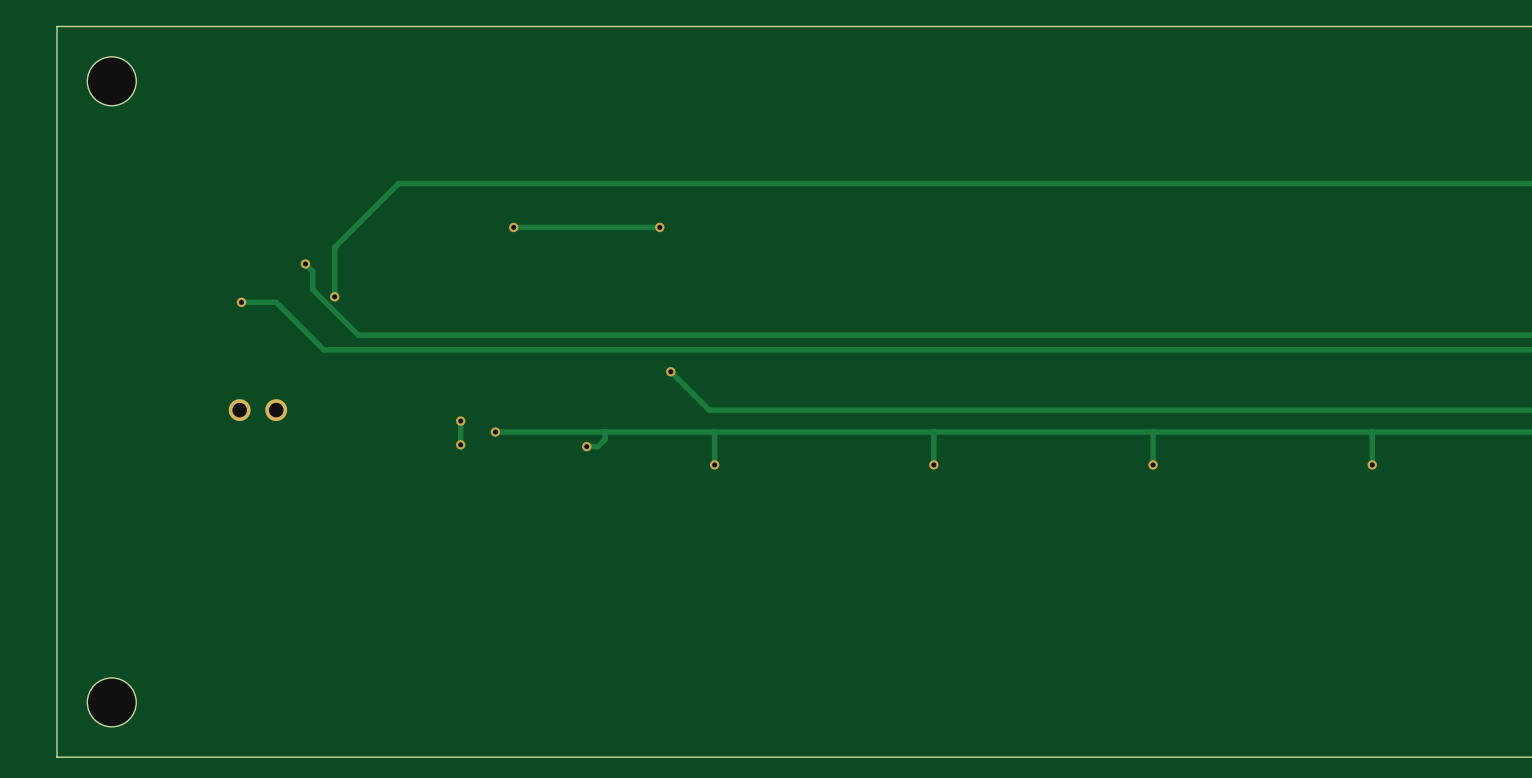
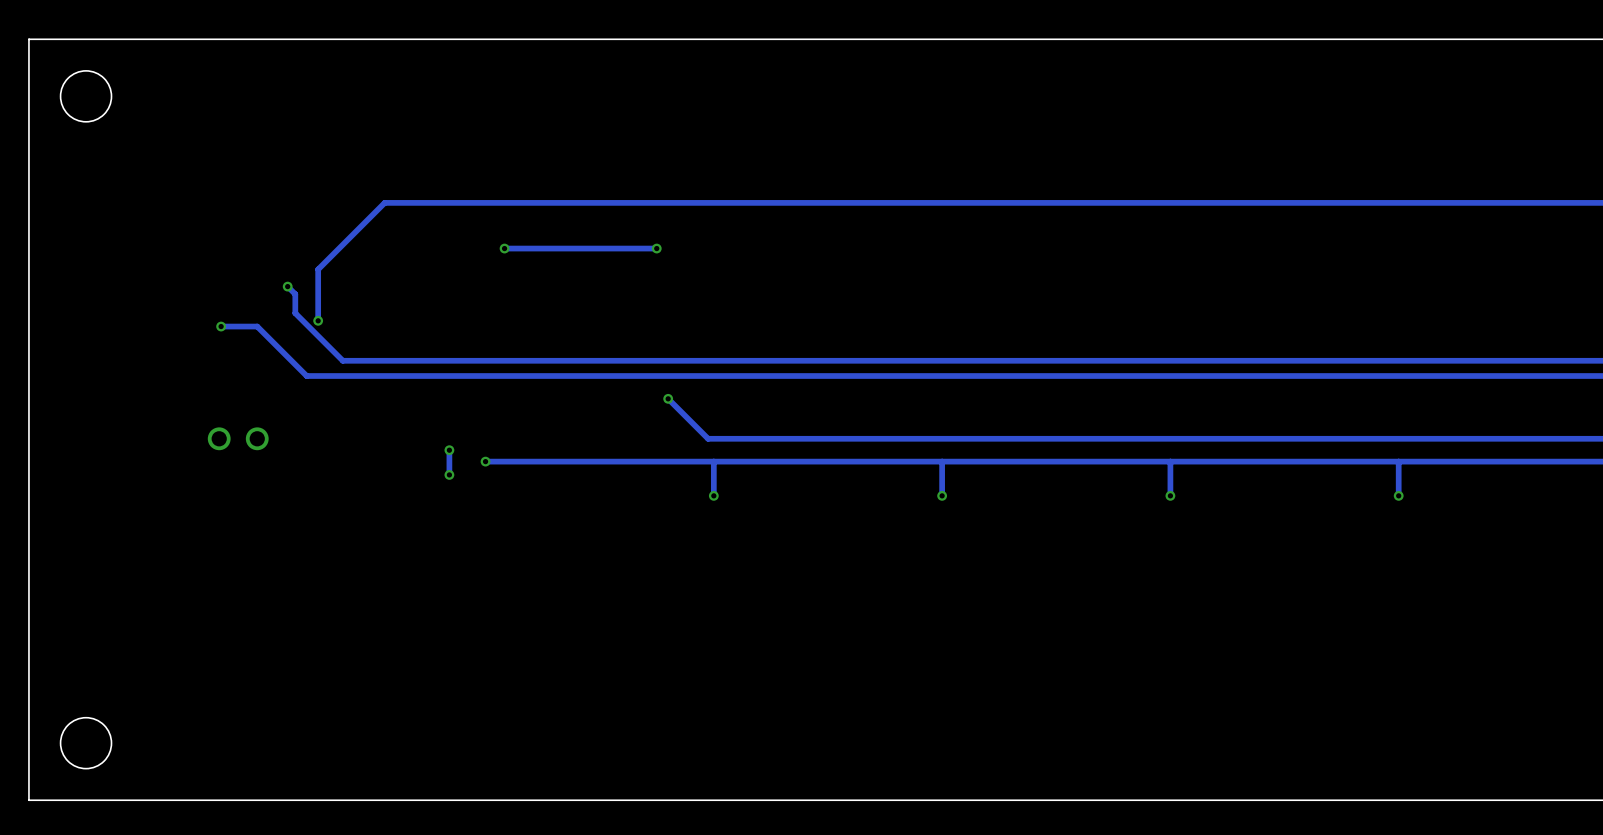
track: (605, 432) (605, 439) (597, 446) (586, 446) -> none
via: (586, 446) -> none

